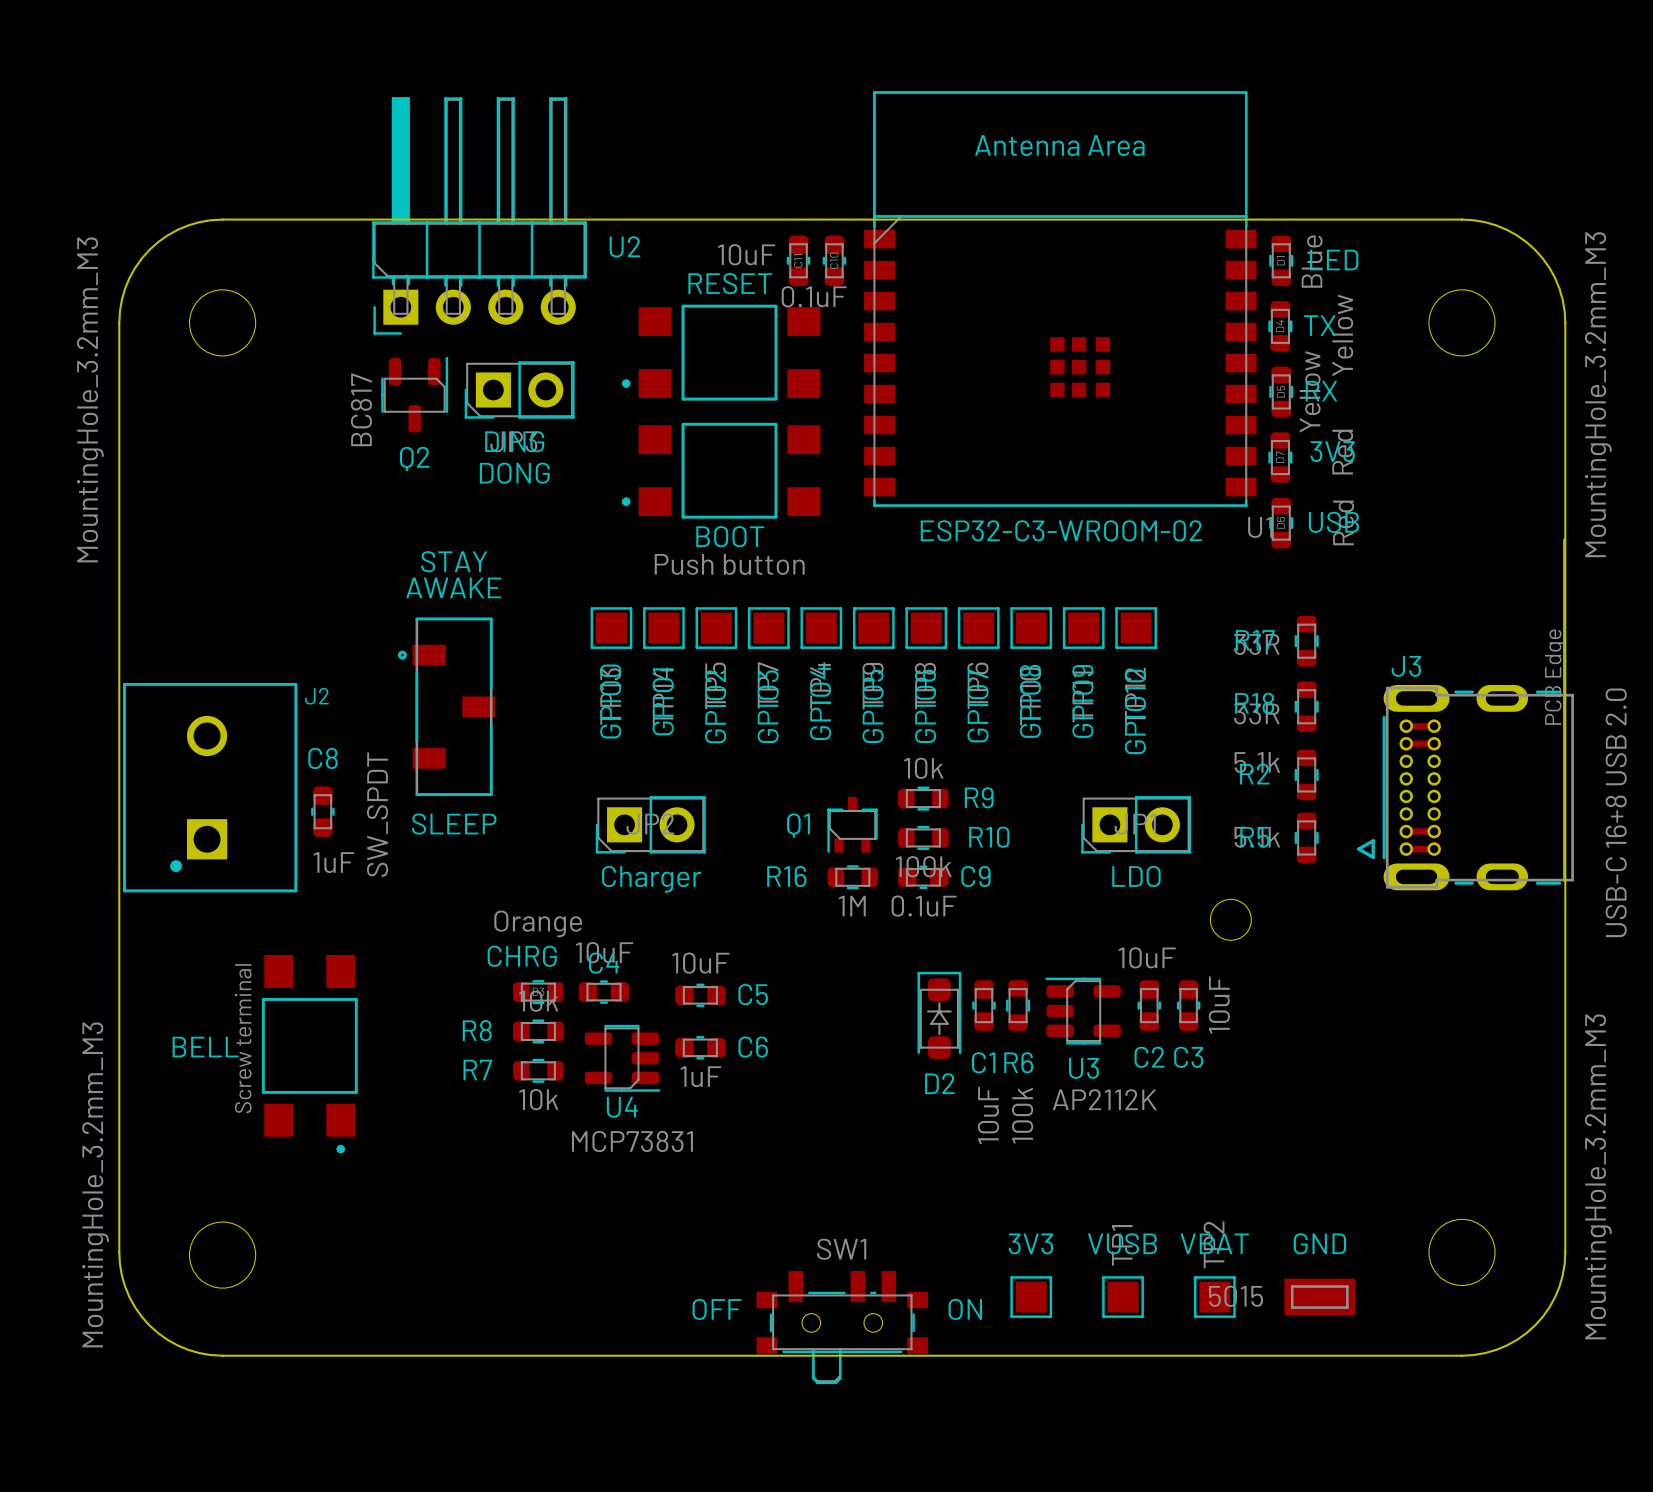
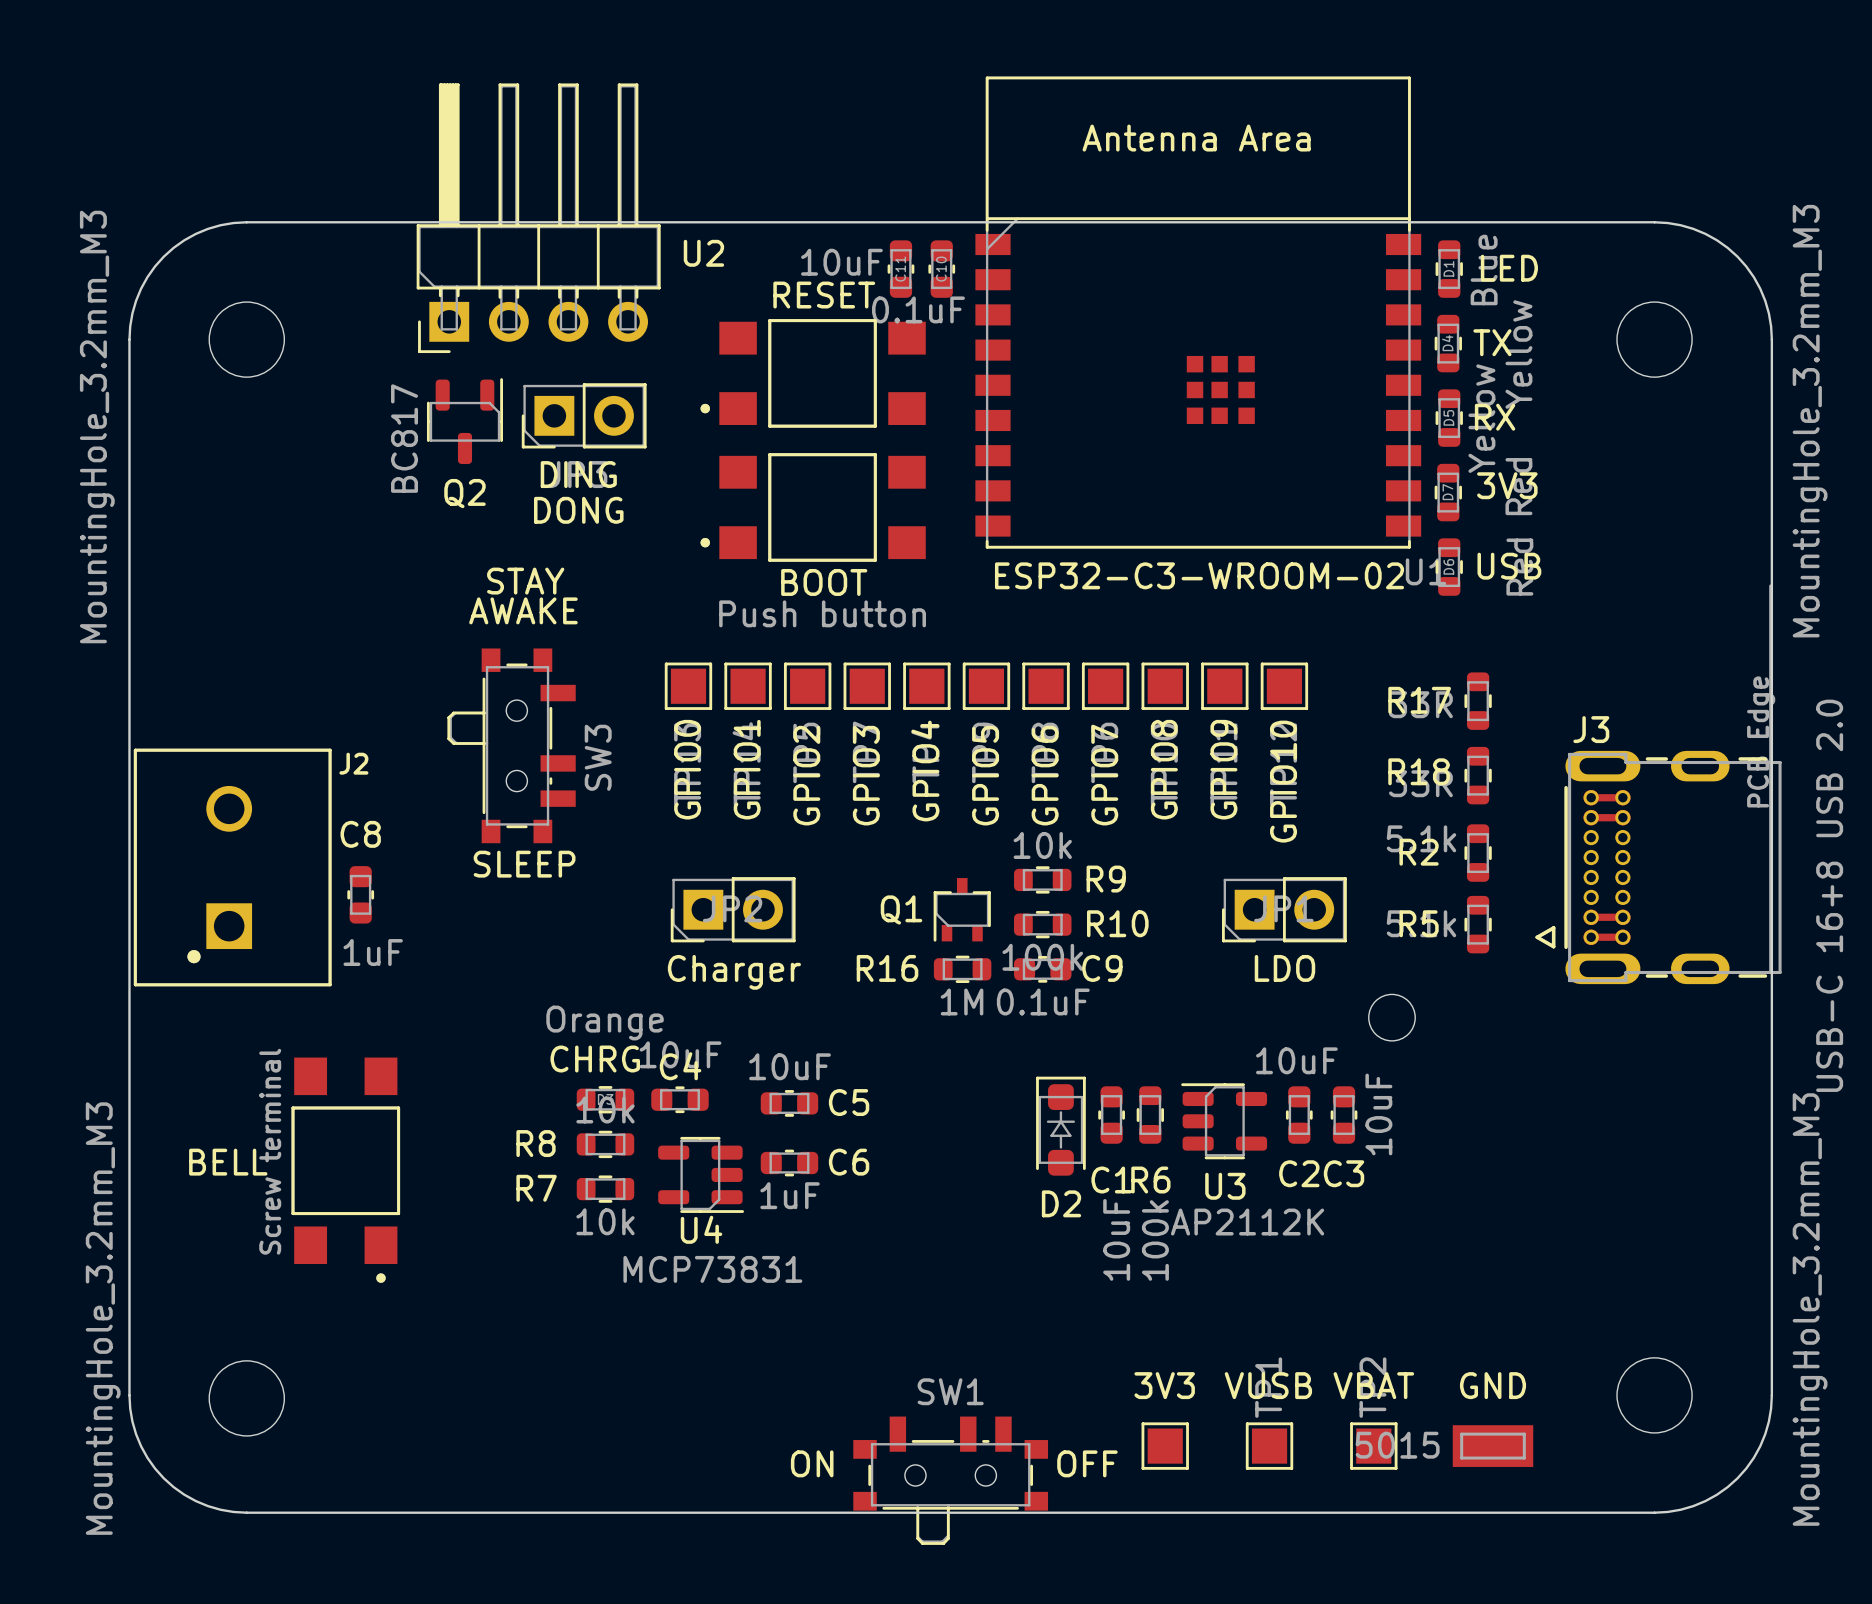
SW3: none -> (511, 745)
part: SW_SPDT (446, 706) -> none
SW1 text position: OFF (717, 1309) -> OFF (1087, 1463)
SW1 text position: ON (965, 1309) -> ON (812, 1463)

